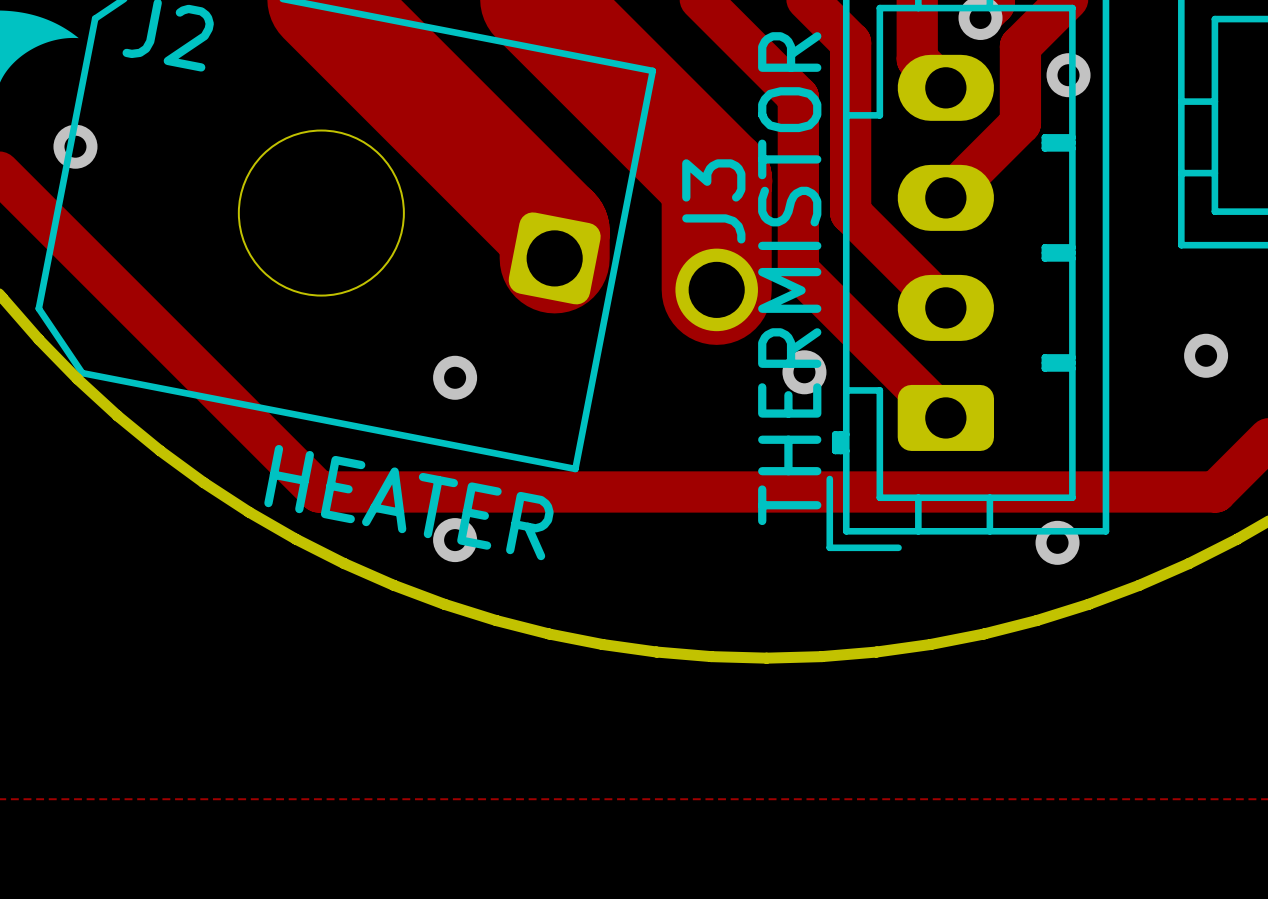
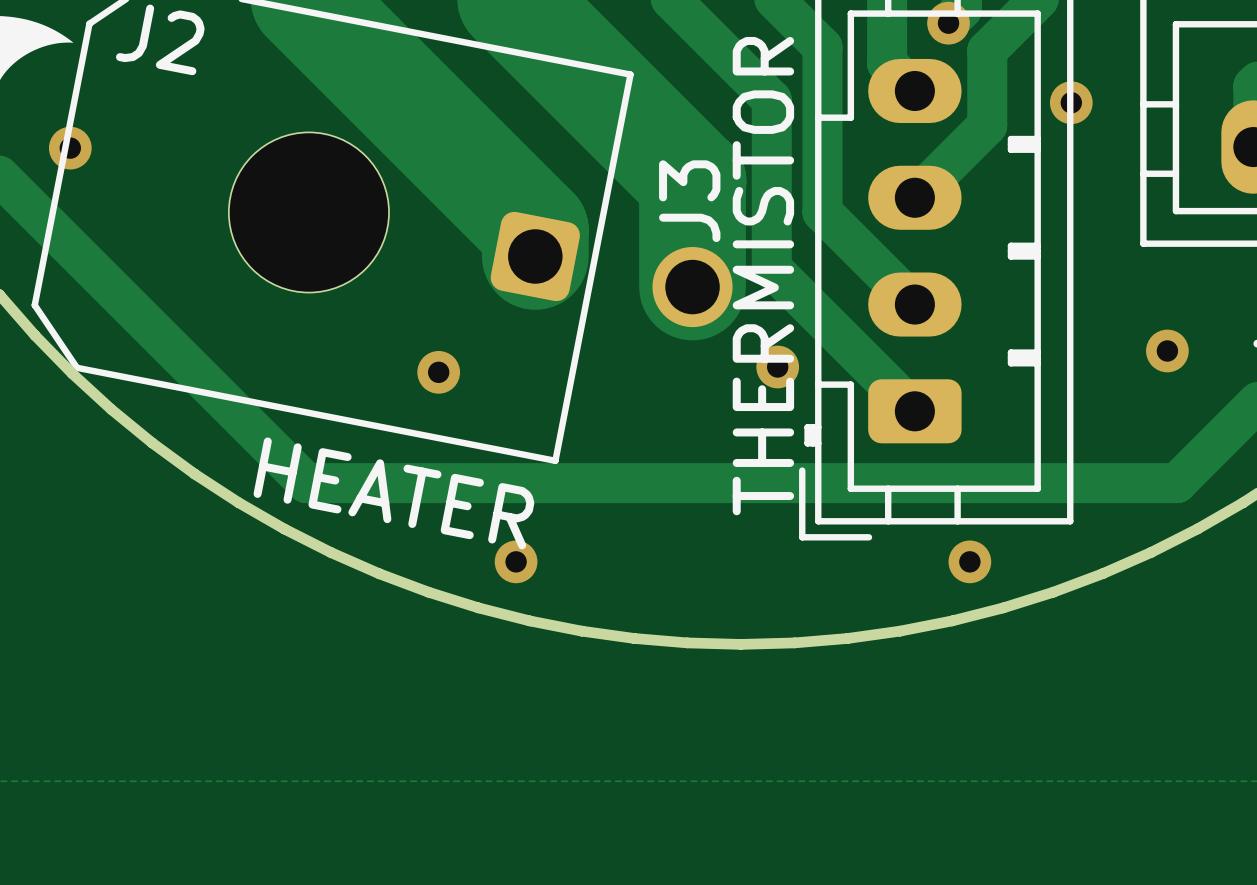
via position: (1068, 75) -> (1071, 102)
via position: (455, 540) -> (516, 561)
via position: (1057, 542) -> (969, 561)

